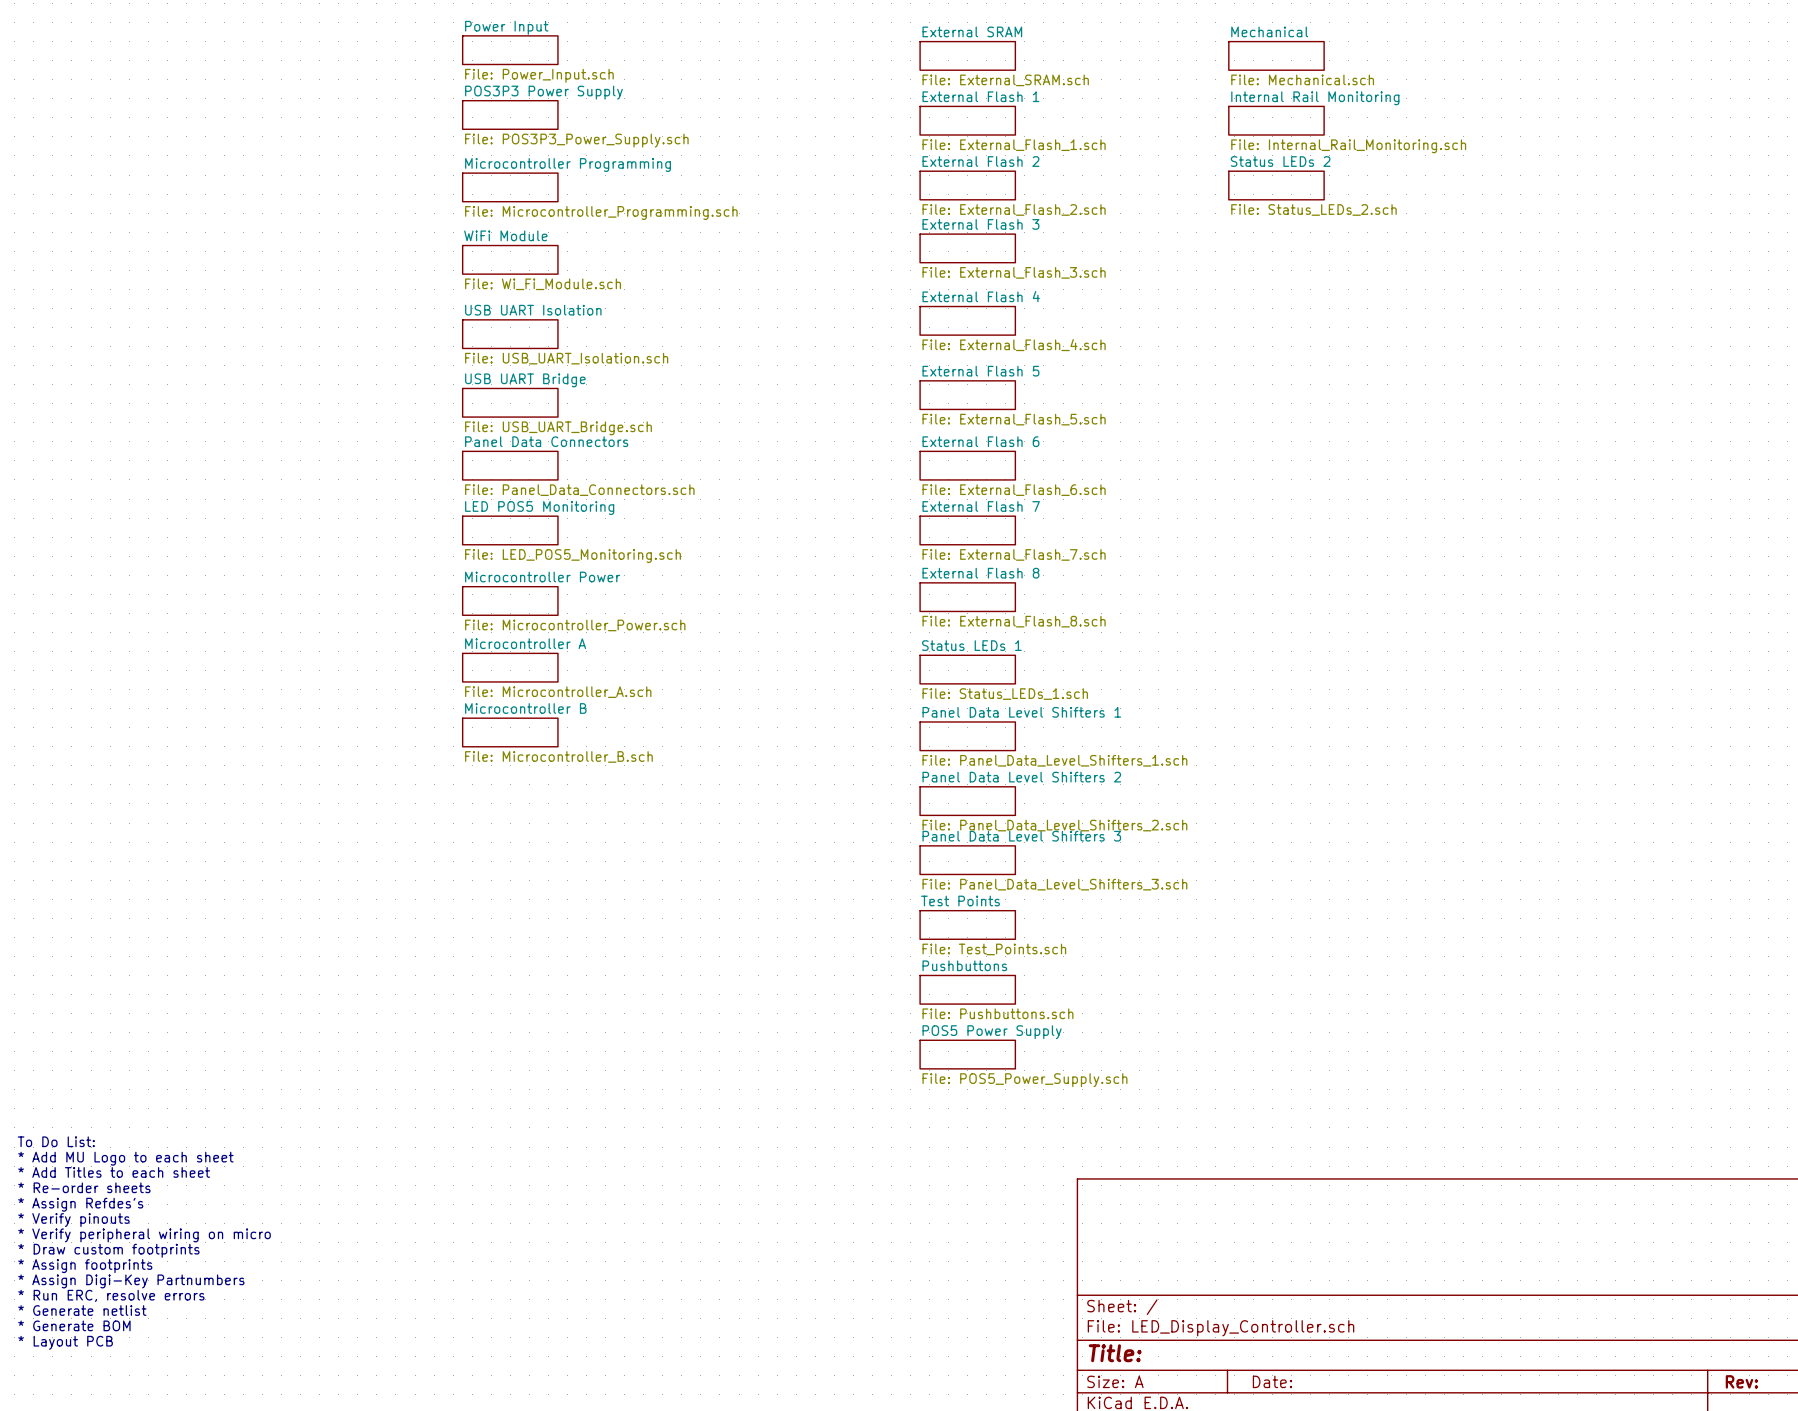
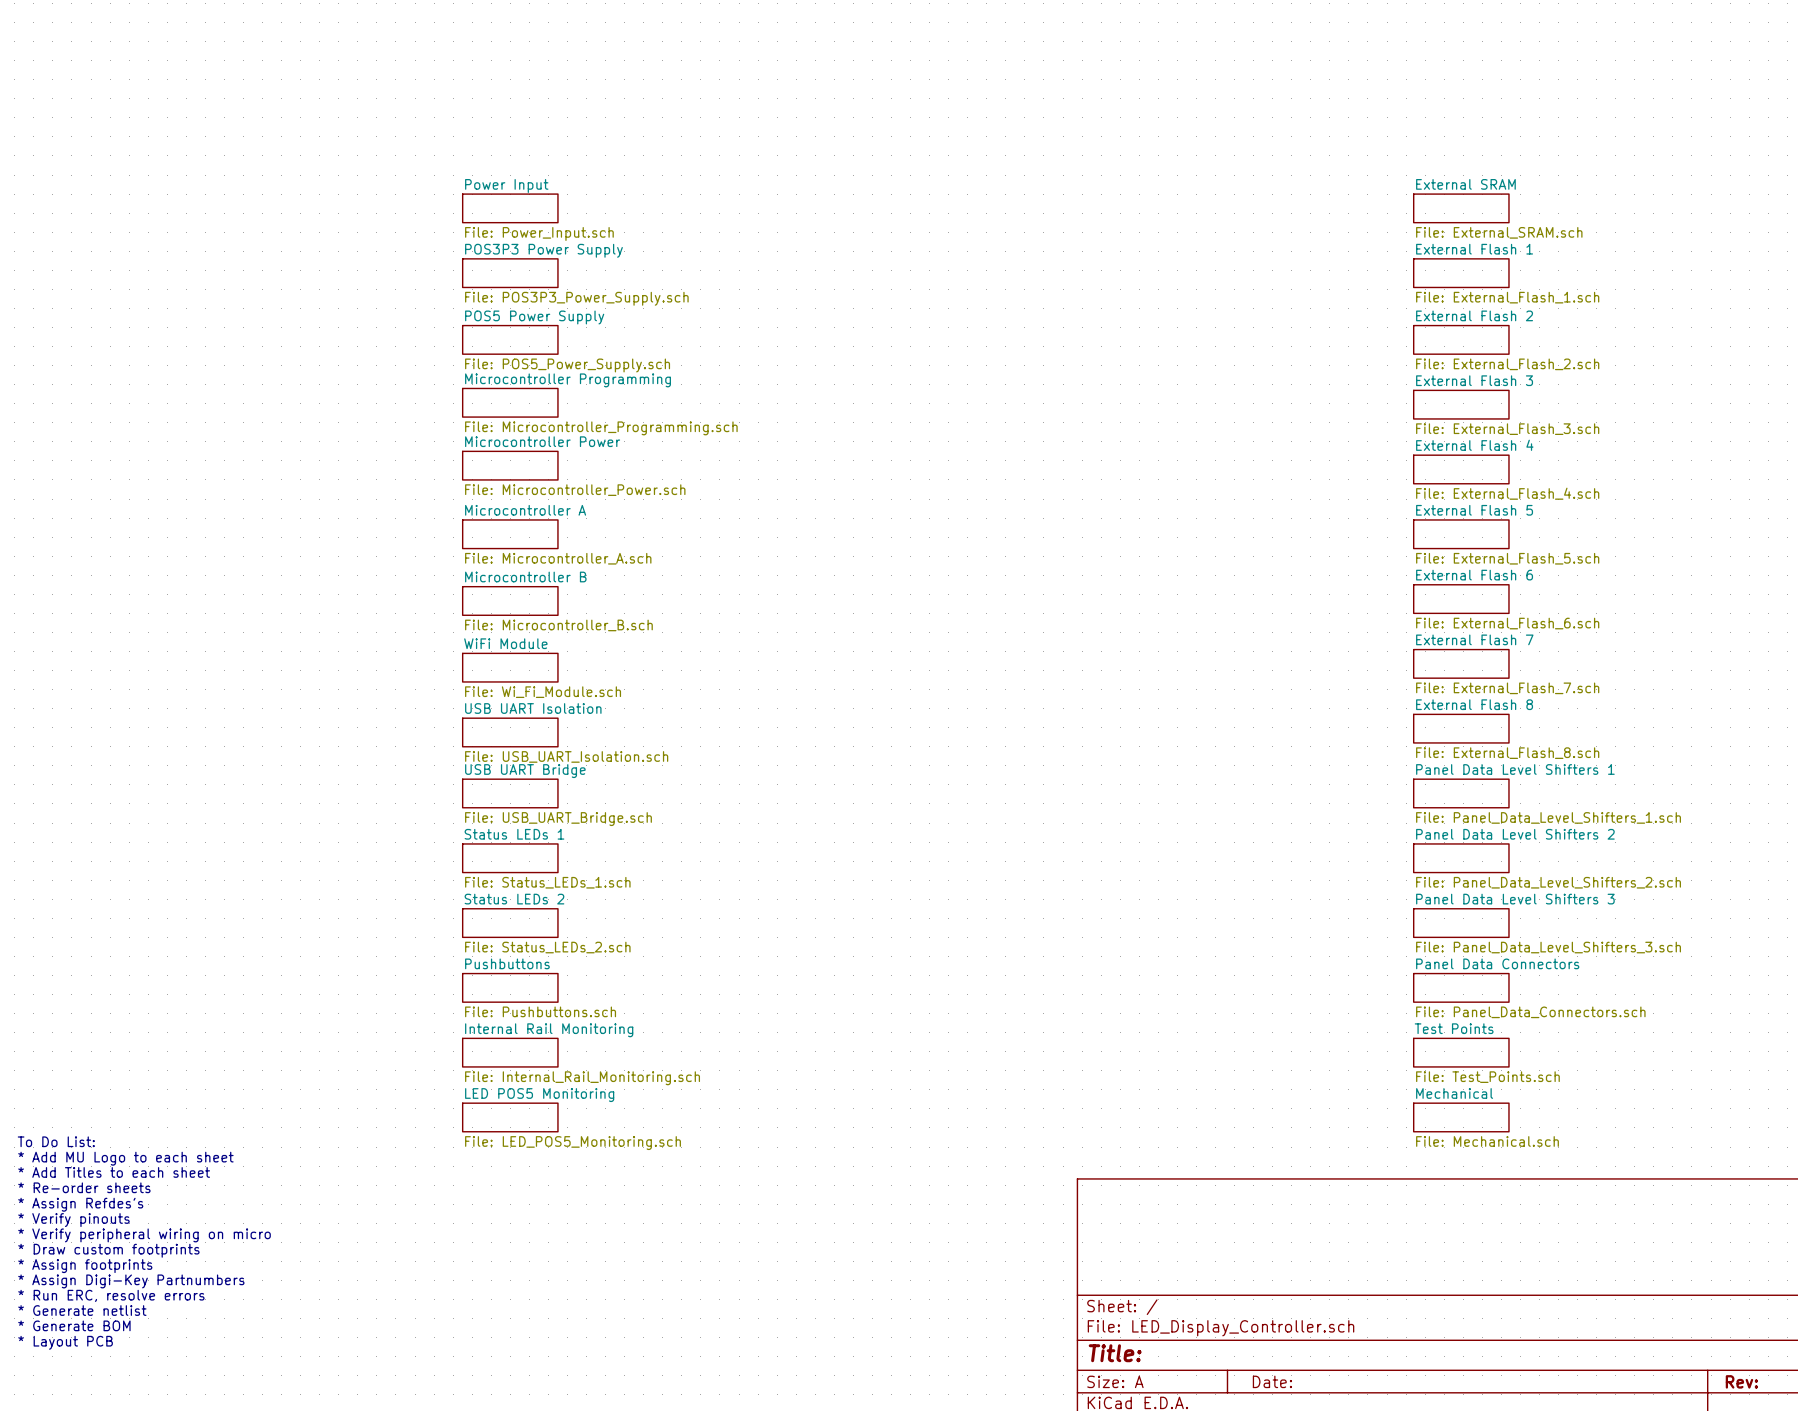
sheet Power Input position: (510, 50) -> (510, 208)
sheet External SRAM: File: External_SRAM.sch (967, 55) -> none
sheet Mechanical: File: Mechanical.sch (1276, 55) -> none
sheet POS3P3 Power Supply position: (510, 114) -> (510, 273)
sheet External Flash 1 position: (967, 120) -> (1461, 273)
sheet Internal Rail Monitoring: File: Internal_Rail_Monitoring.sch (1276, 120) -> none
sheet External Flash 2 position: (967, 185) -> (1461, 339)
sheet Status LEDs 2 position: (1276, 185) -> (510, 923)
sheet Microcontroller Programming: File: Microcontroller_Programming.sch (510, 187) -> none
sheet External SRAM: none -> File: External_SRAM.sch (1461, 208)
sheet External Flash 3 position: (967, 248) -> (1461, 404)
sheet WiFi Module: File: Wi_Fi_Module.sch (510, 259) -> none
sheet External Flash 4 position: (967, 320) -> (1461, 469)
sheet USB UART Isolation: File: USB_UART_Isolation.sch (510, 334) -> none
sheet USB UART Bridge name: USB UART Bridge (525, 380) -> Microcontroller Programming (568, 380)
sheet External Flash 5 position: (967, 395) -> (1461, 534)
sheet USB UART Bridge value: File: USB_UART_Bridge.sch (558, 428) -> File: Microcontroller_Programming.sch (601, 428)
sheet Panel Data Connectors name: Panel Data Connectors (546, 441) -> Microcontroller Power (542, 441)
sheet External Flash 6 position: (967, 465) -> (1461, 599)
sheet Panel Data Connectors value: File: Panel_Data_Connectors.sch (579, 490) -> File: Microcontroller_Power.sch (575, 490)
sheet LED POS5 Monitoring position: (510, 530) -> (510, 1117)
sheet External Flash 7 position: (967, 530) -> (1461, 663)
sheet Microcontroller A: none -> File: Microcontroller_A.sch (510, 534)
sheet Microcontroller Power name: Microcontroller Power (542, 577) -> Microcontroller B (525, 577)
sheet External Flash 8 position: (967, 597) -> (1461, 728)
sheet Microcontroller Power value: File: Microcontroller_Power.sch (575, 625) -> File: Microcontroller_B.sch (558, 625)
sheet Microcontroller A name: Microcontroller A (525, 643) -> WiFi Module (505, 643)
sheet Status LEDs 1 position: (967, 669) -> (510, 858)
sheet Microcontroller A value: File: Microcontroller_A.sch (558, 692) -> File: Wi_Fi_Module.sch (543, 692)
sheet Microcontroller B name: Microcontroller B (525, 708) -> USB UART Isolation (533, 708)
sheet Panel Data Level Shifters 1 position: (967, 736) -> (1461, 793)
sheet Microcontroller B value: File: Microcontroller_B.sch (558, 756) -> File: USB_UART_Isolation.sch (566, 756)
sheet USB UART Bridge: none -> File: USB_UART_Bridge.sch (510, 793)
sheet Panel Data Level Shifters 2 position: (967, 801) -> (1461, 858)
sheet Panel Data Level Shifters 3 position: (967, 860) -> (1461, 923)
sheet Test Points: File: Test_Points.sch (967, 924) -> none
sheet Pushbuttons: none -> File: Pushbuttons.sch (510, 987)
sheet Panel Data Connectors: none -> File: Panel_Data_Connectors.sch (1461, 987)
sheet Pushbuttons: File: Pushbuttons.sch (967, 989) -> none
sheet Internal Rail Monitoring: none -> File: Internal_Rail_Monitoring.sch (510, 1052)
sheet Test Points: none -> File: Test_Points.sch (1461, 1052)
sheet POS5 Power Supply position: (967, 1054) -> (510, 339)
sheet Mechanical: none -> File: Mechanical.sch (1461, 1117)

